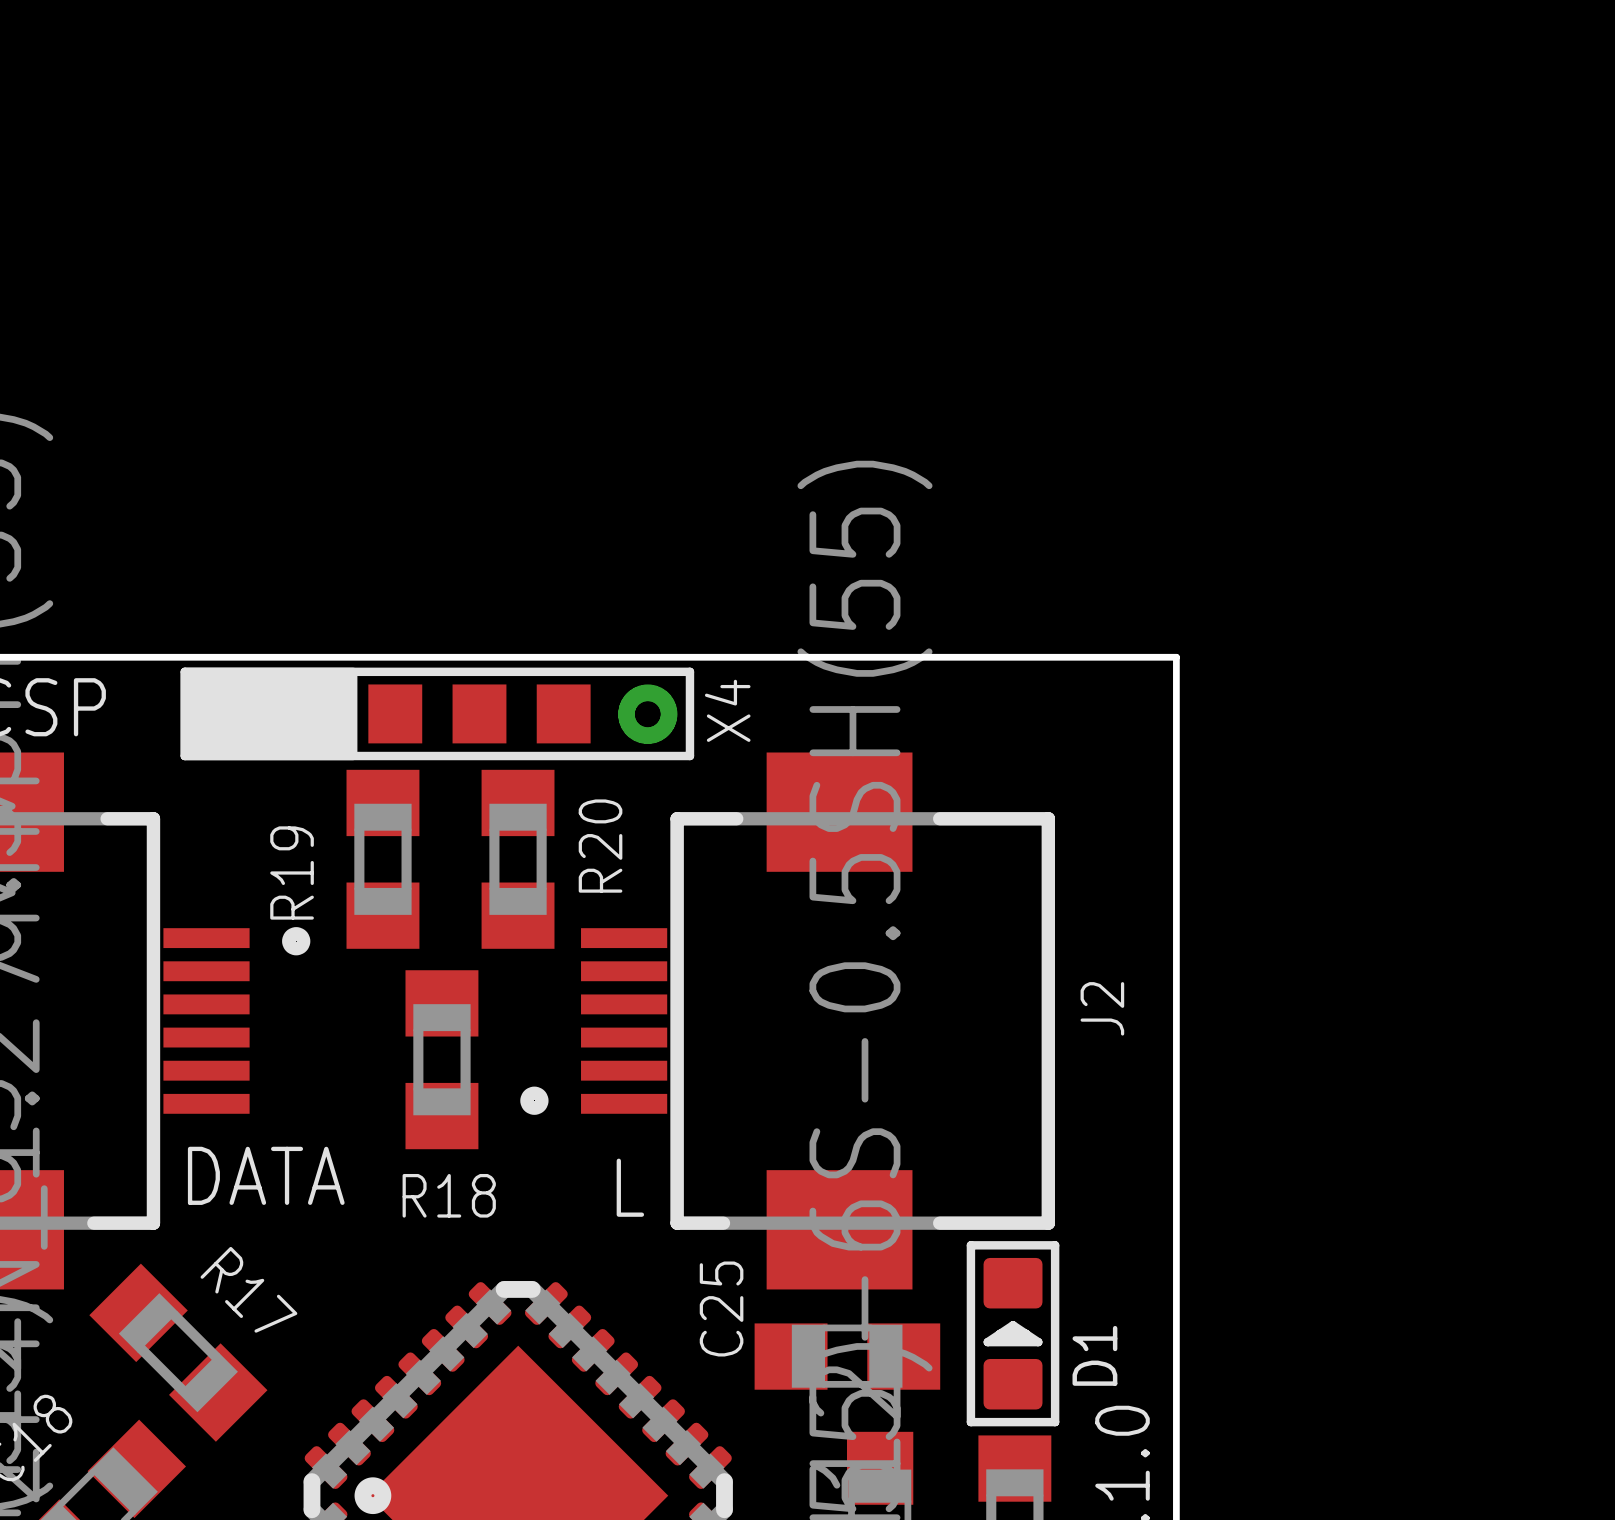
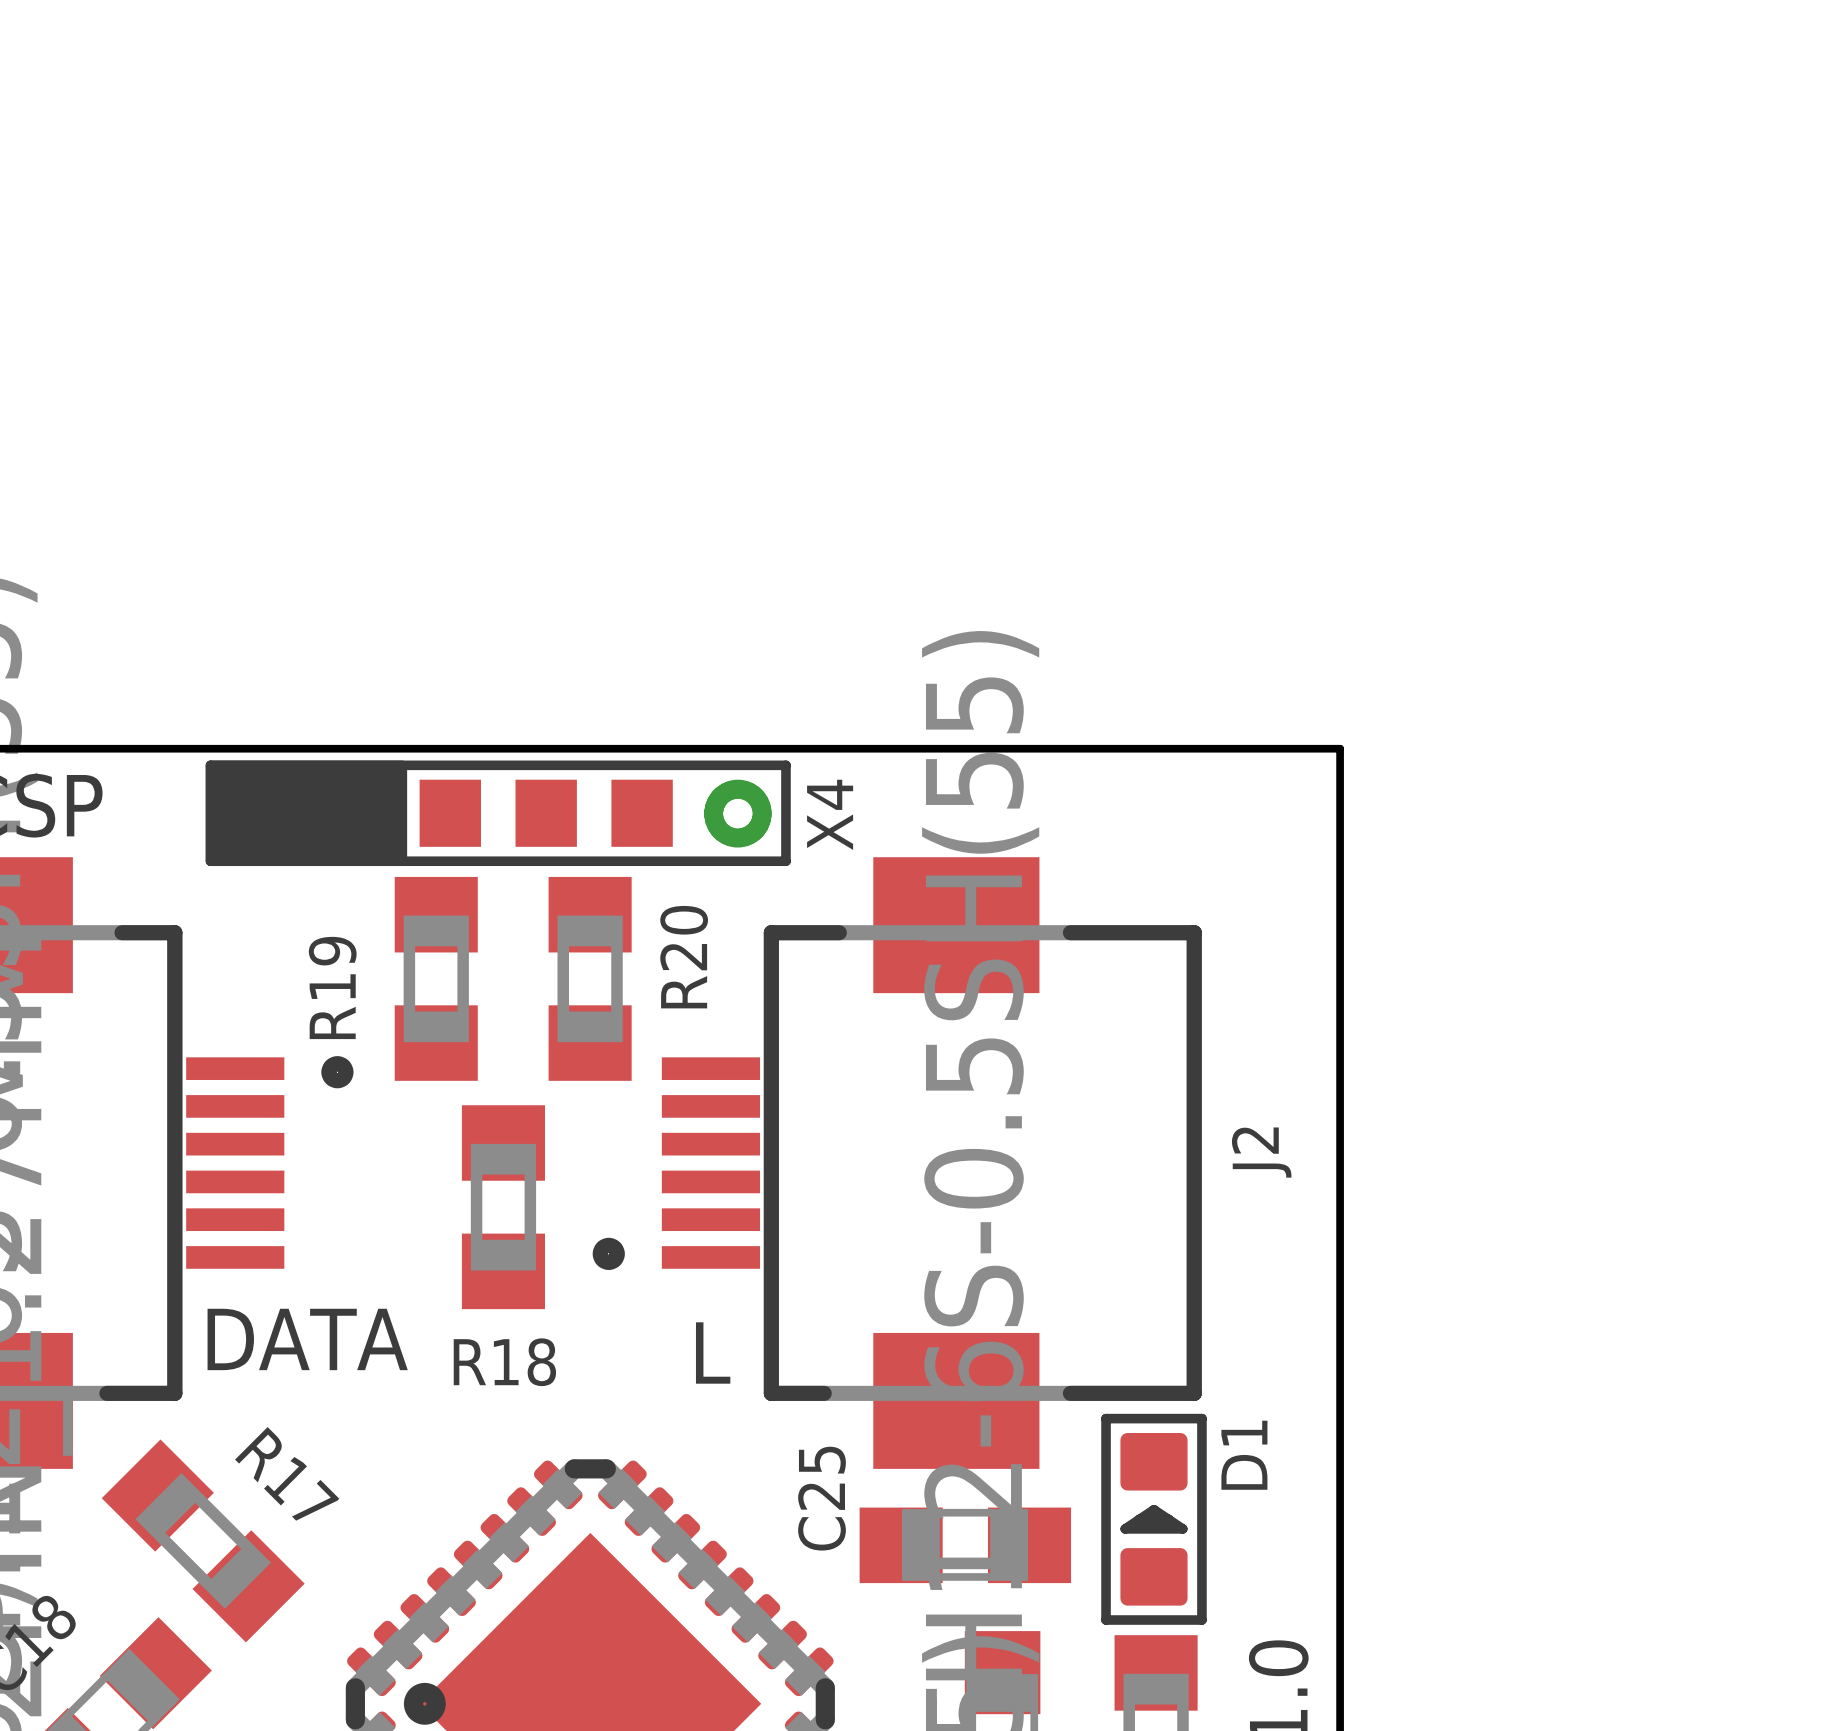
D1 name position: D1 (1094, 1355) -> D1 (1244, 1455)

